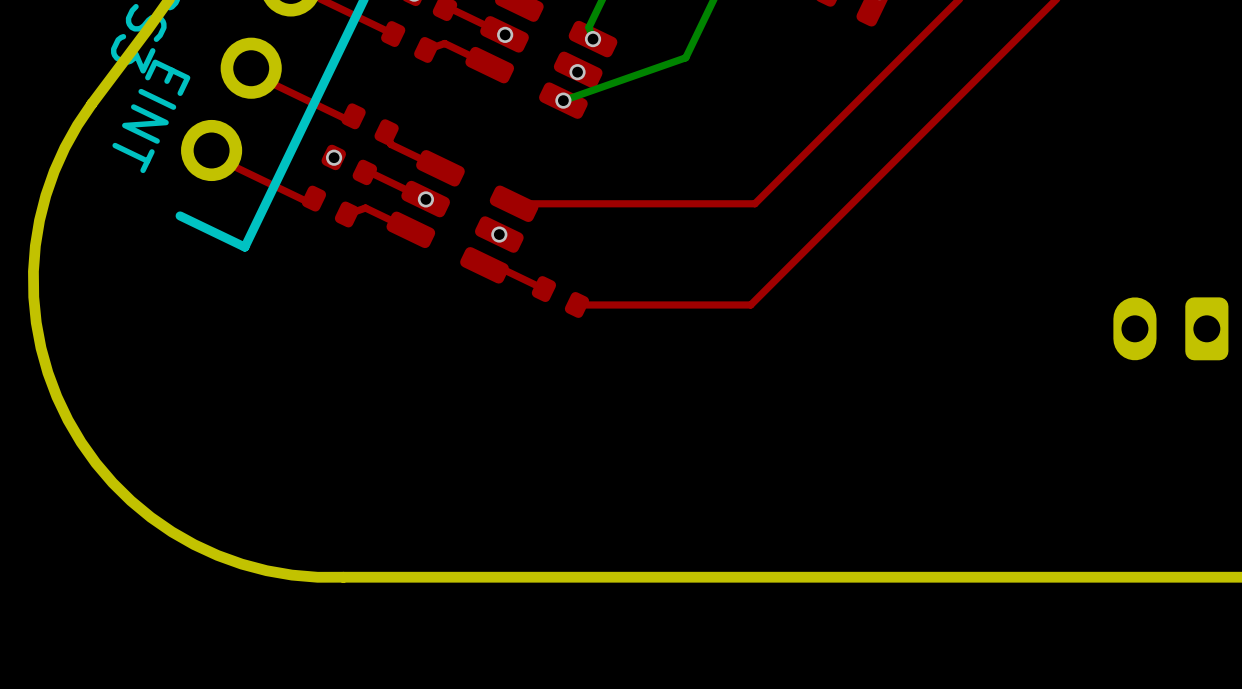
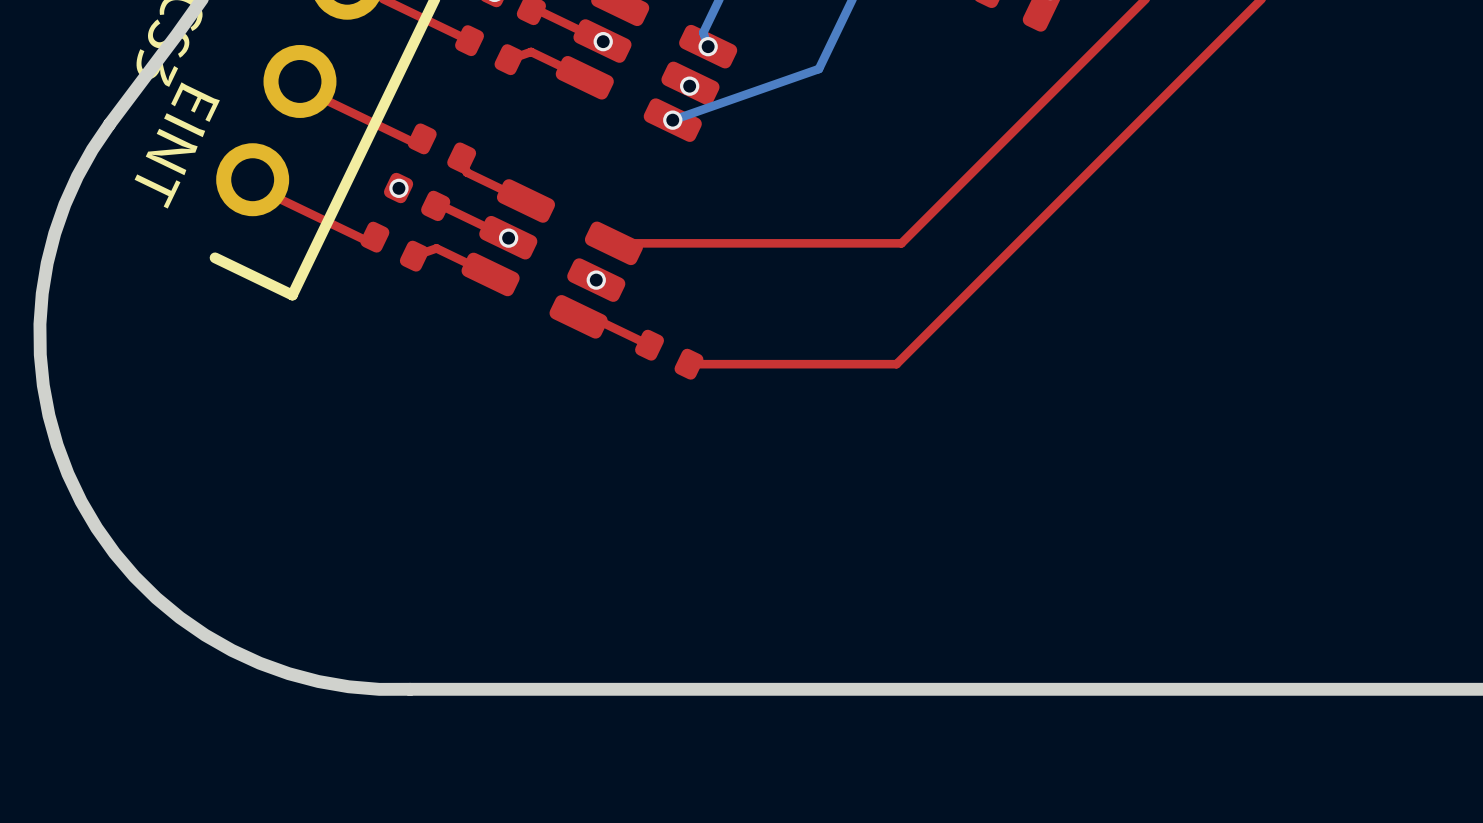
part: (1170, 328) -> none

